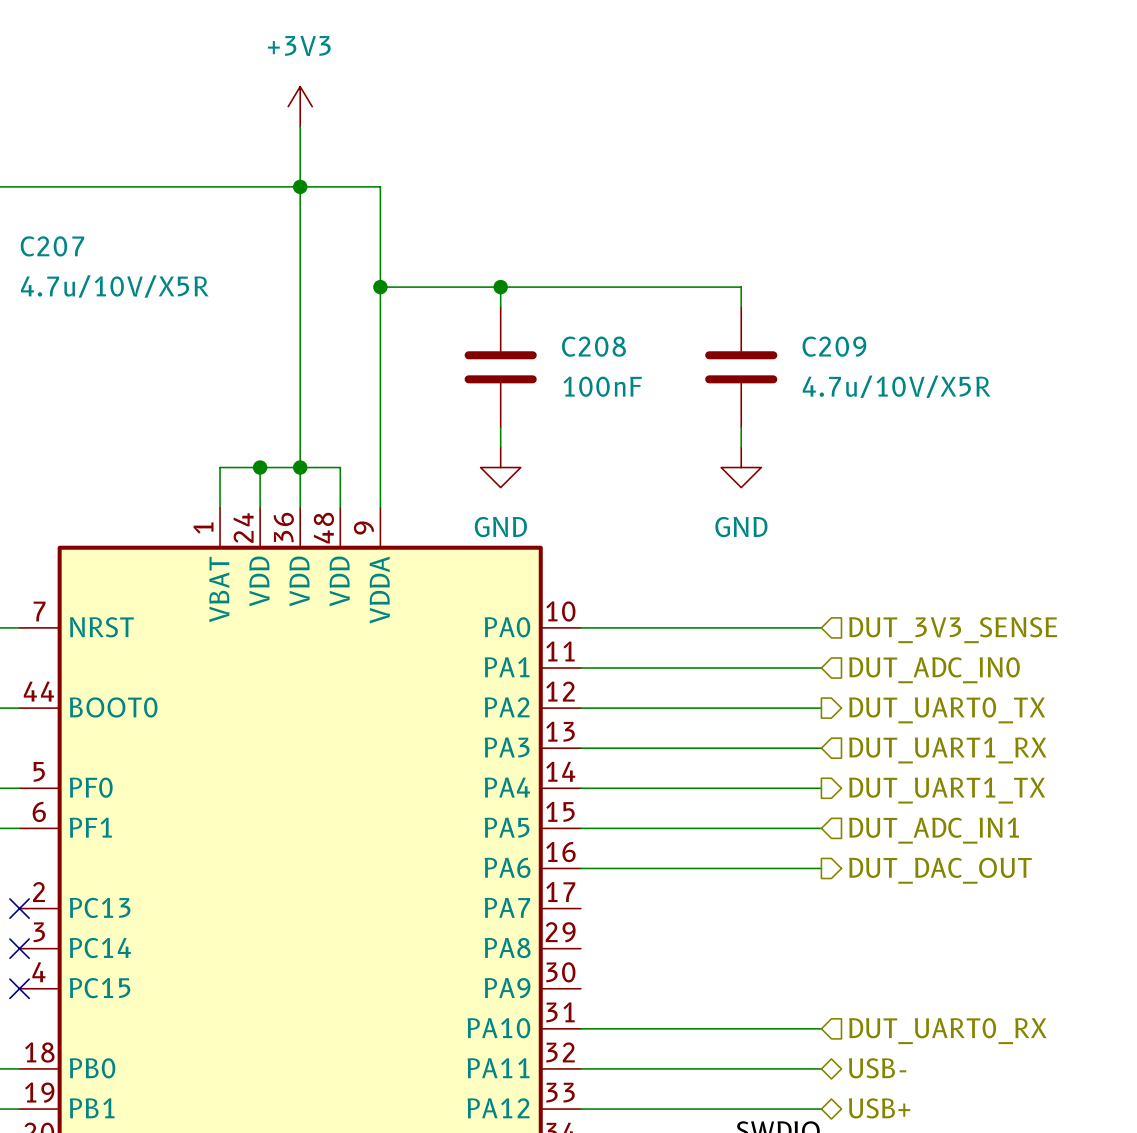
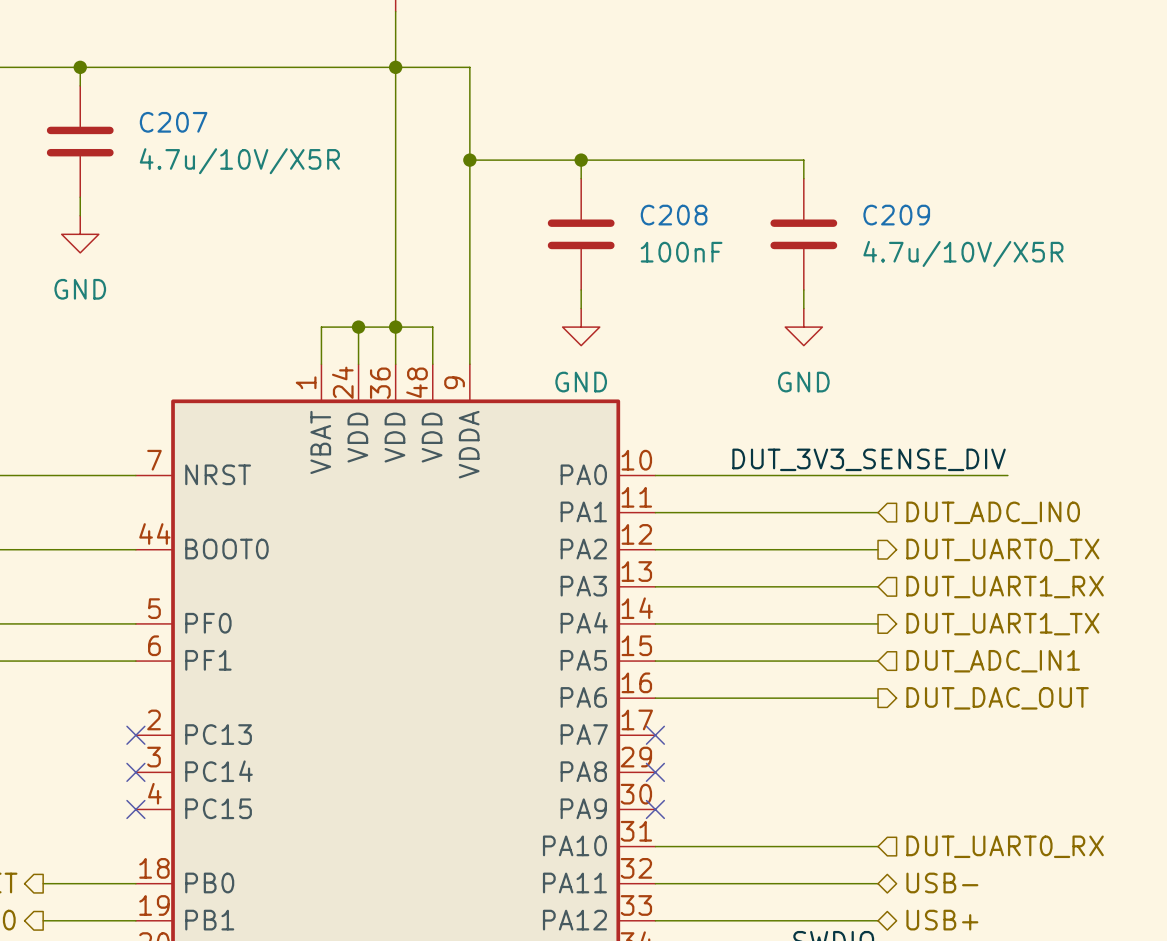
label: none -> DUT_3V3_SENSE_DIV (869, 459)
wire: none -> (878, 475) (1007, 475)
hierarchical label: DUT_3V3_SENSE (953, 630) -> none
no-connect mark: none -> (655, 735)
no-connect mark: none -> (655, 772)
no-connect mark: none -> (655, 809)

